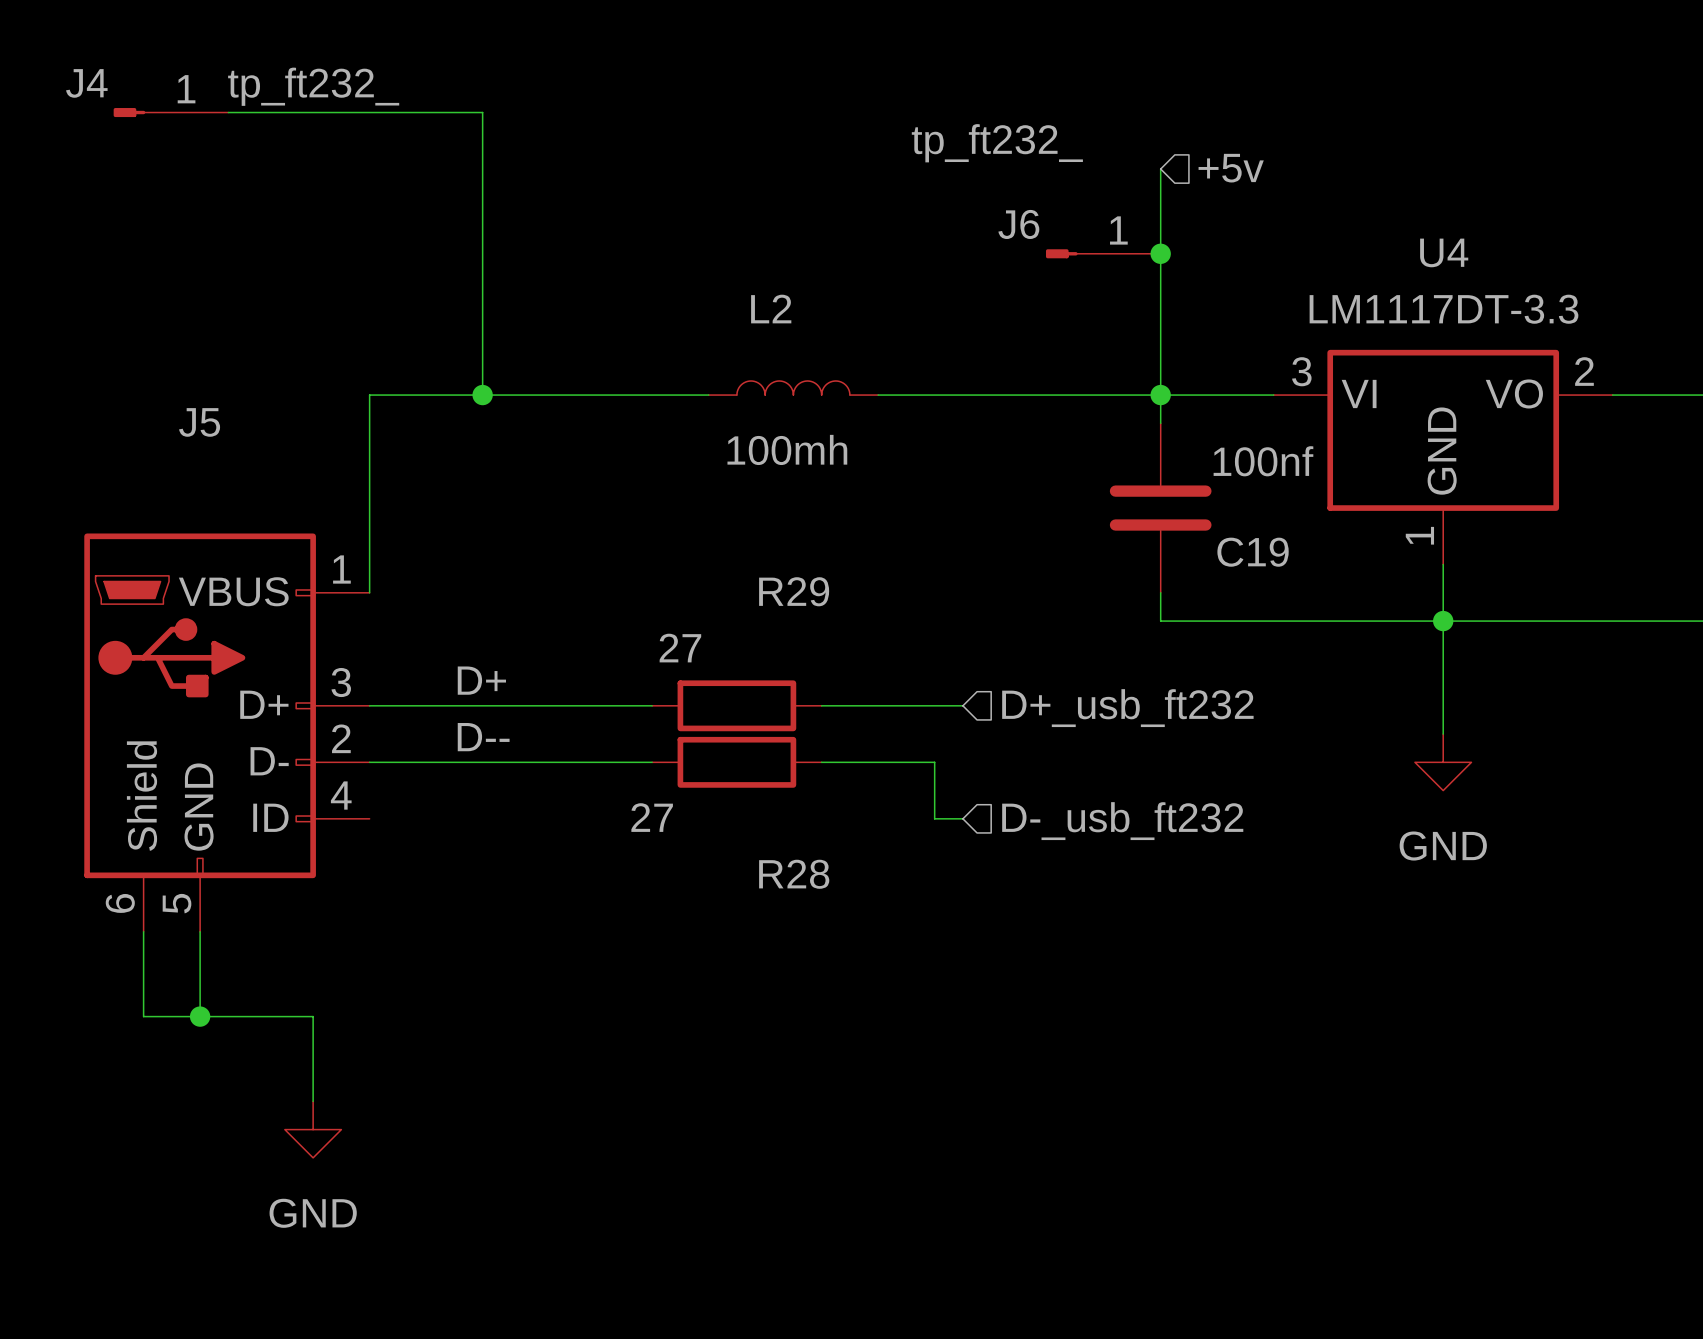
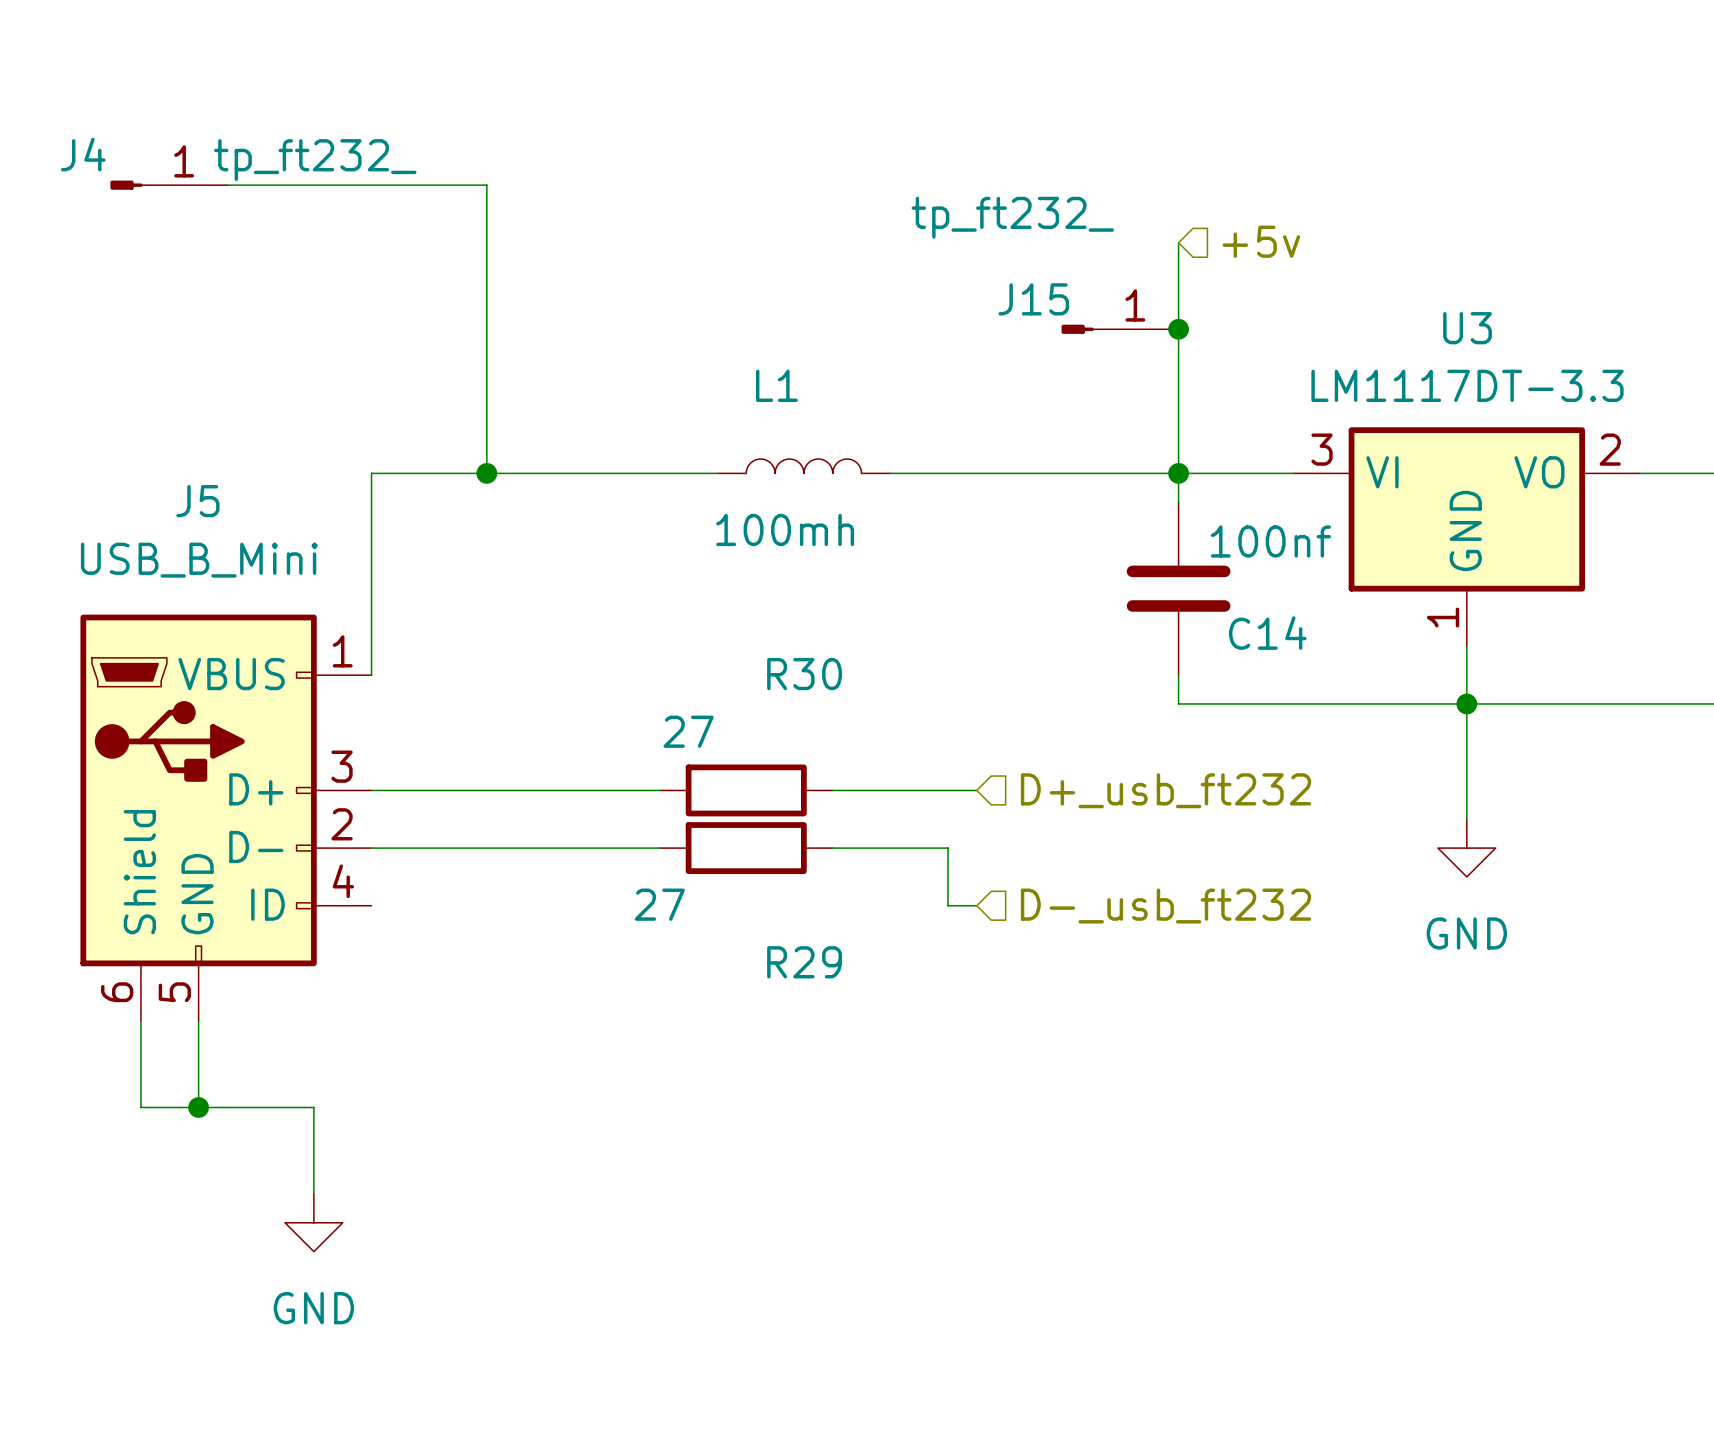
J6 name: J6 (1018, 224) -> J15 (1033, 299)
U4 name: U4 (1444, 252) -> U3 (1467, 328)
L2 name: L2 (771, 309) -> L1 (776, 385)
J5 value: none -> USB_B_Mini (199, 560)
C19 name: C19 (1253, 552) -> C14 (1267, 633)
R29 name: R29 (794, 591) -> R30 (804, 674)
label: D+ (481, 680) -> none
label: D-- (483, 737) -> none
R28 name: R28 (794, 874) -> R29 (804, 962)

